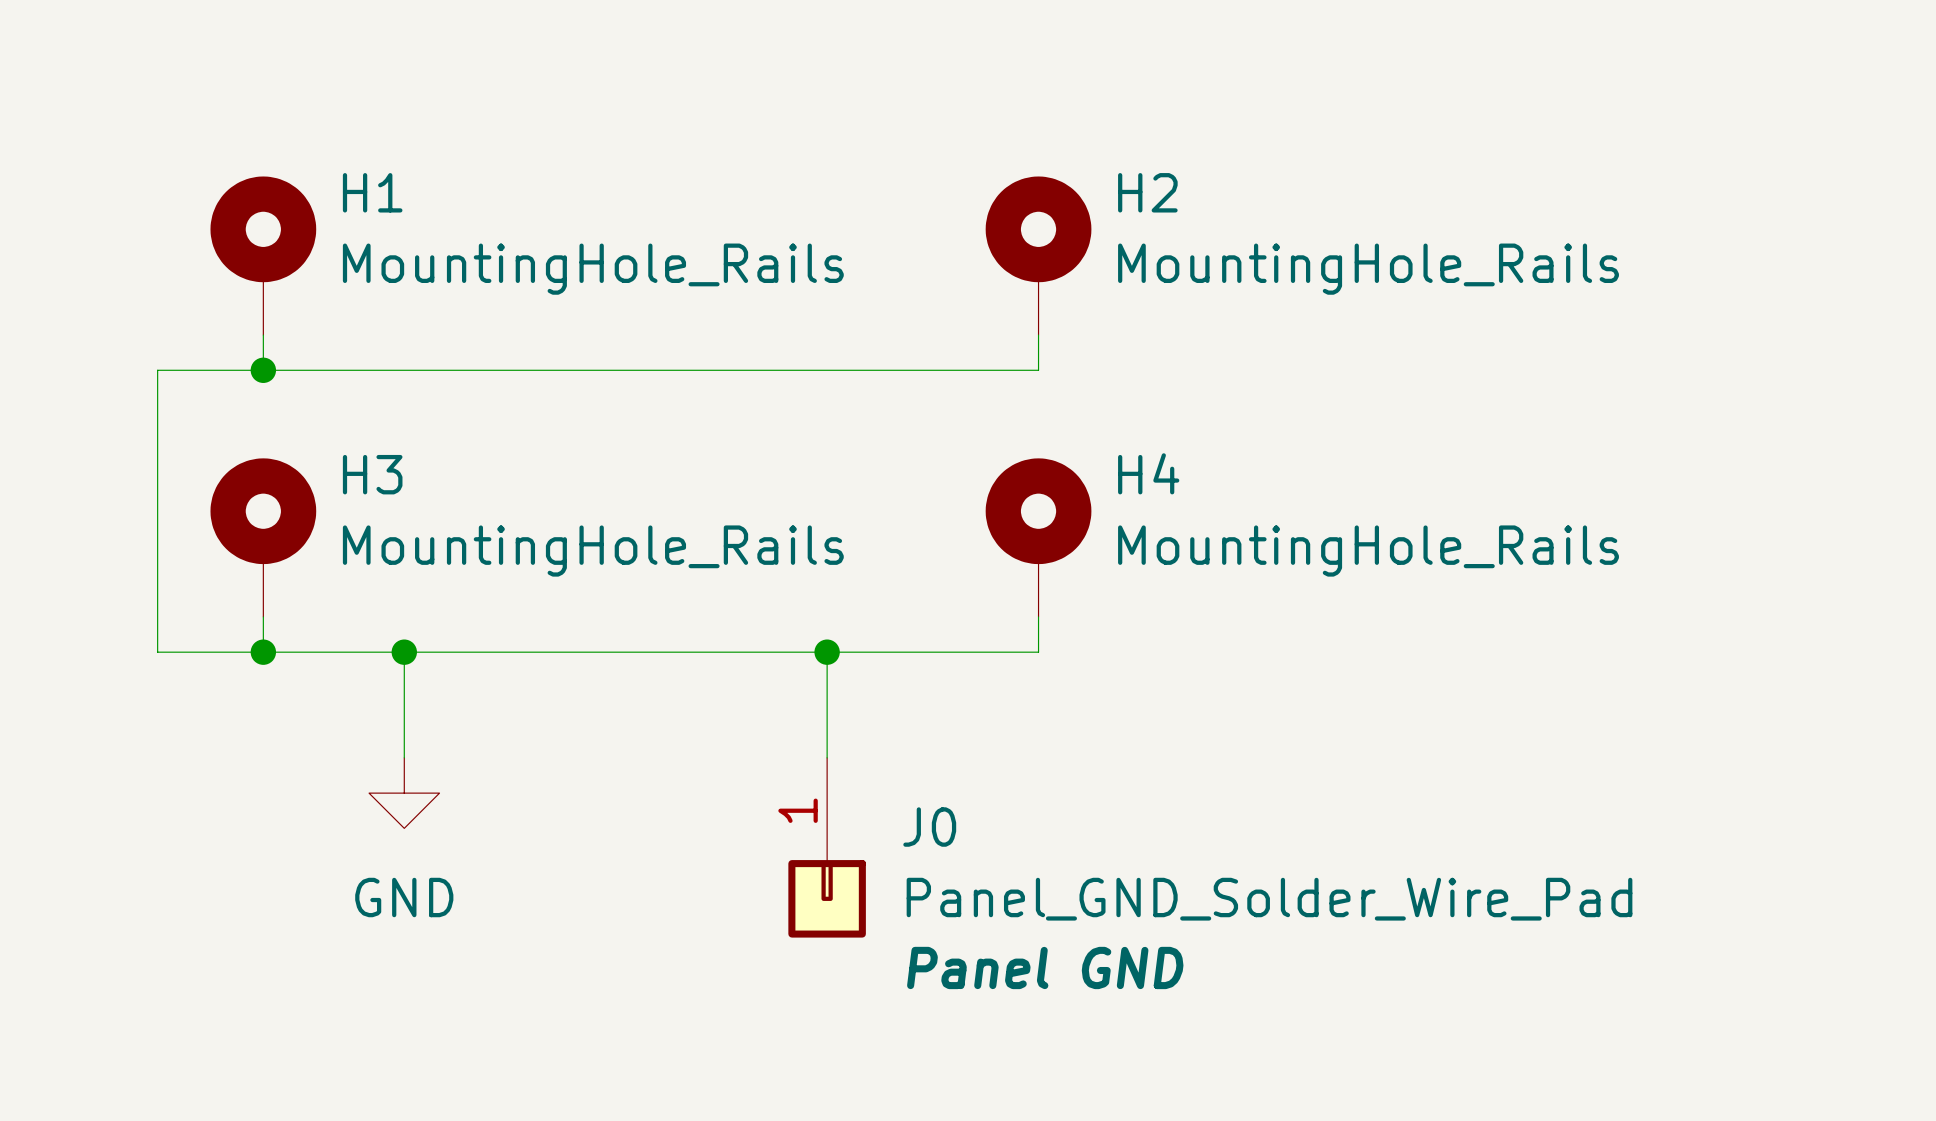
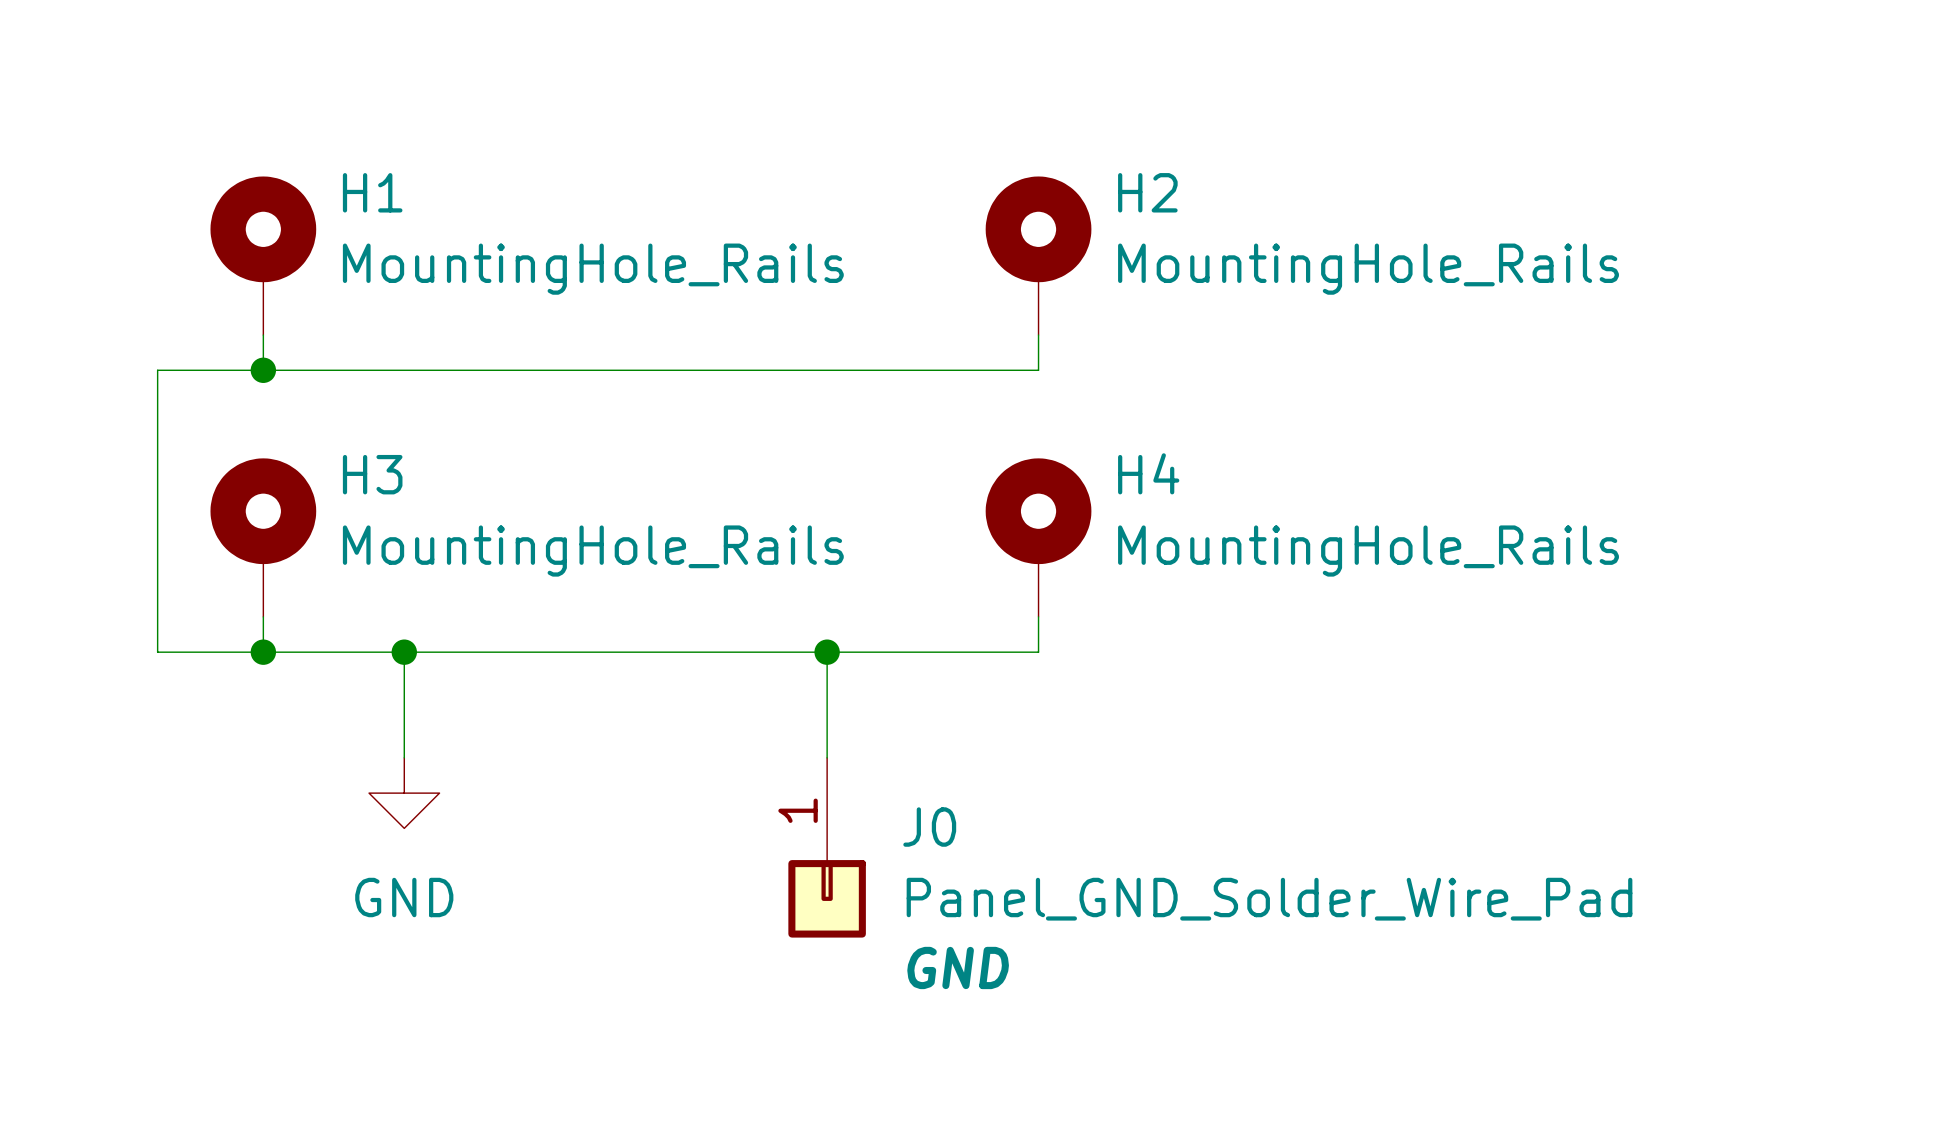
J0 text: Panel GND (1045, 967) -> GND (958, 967)

